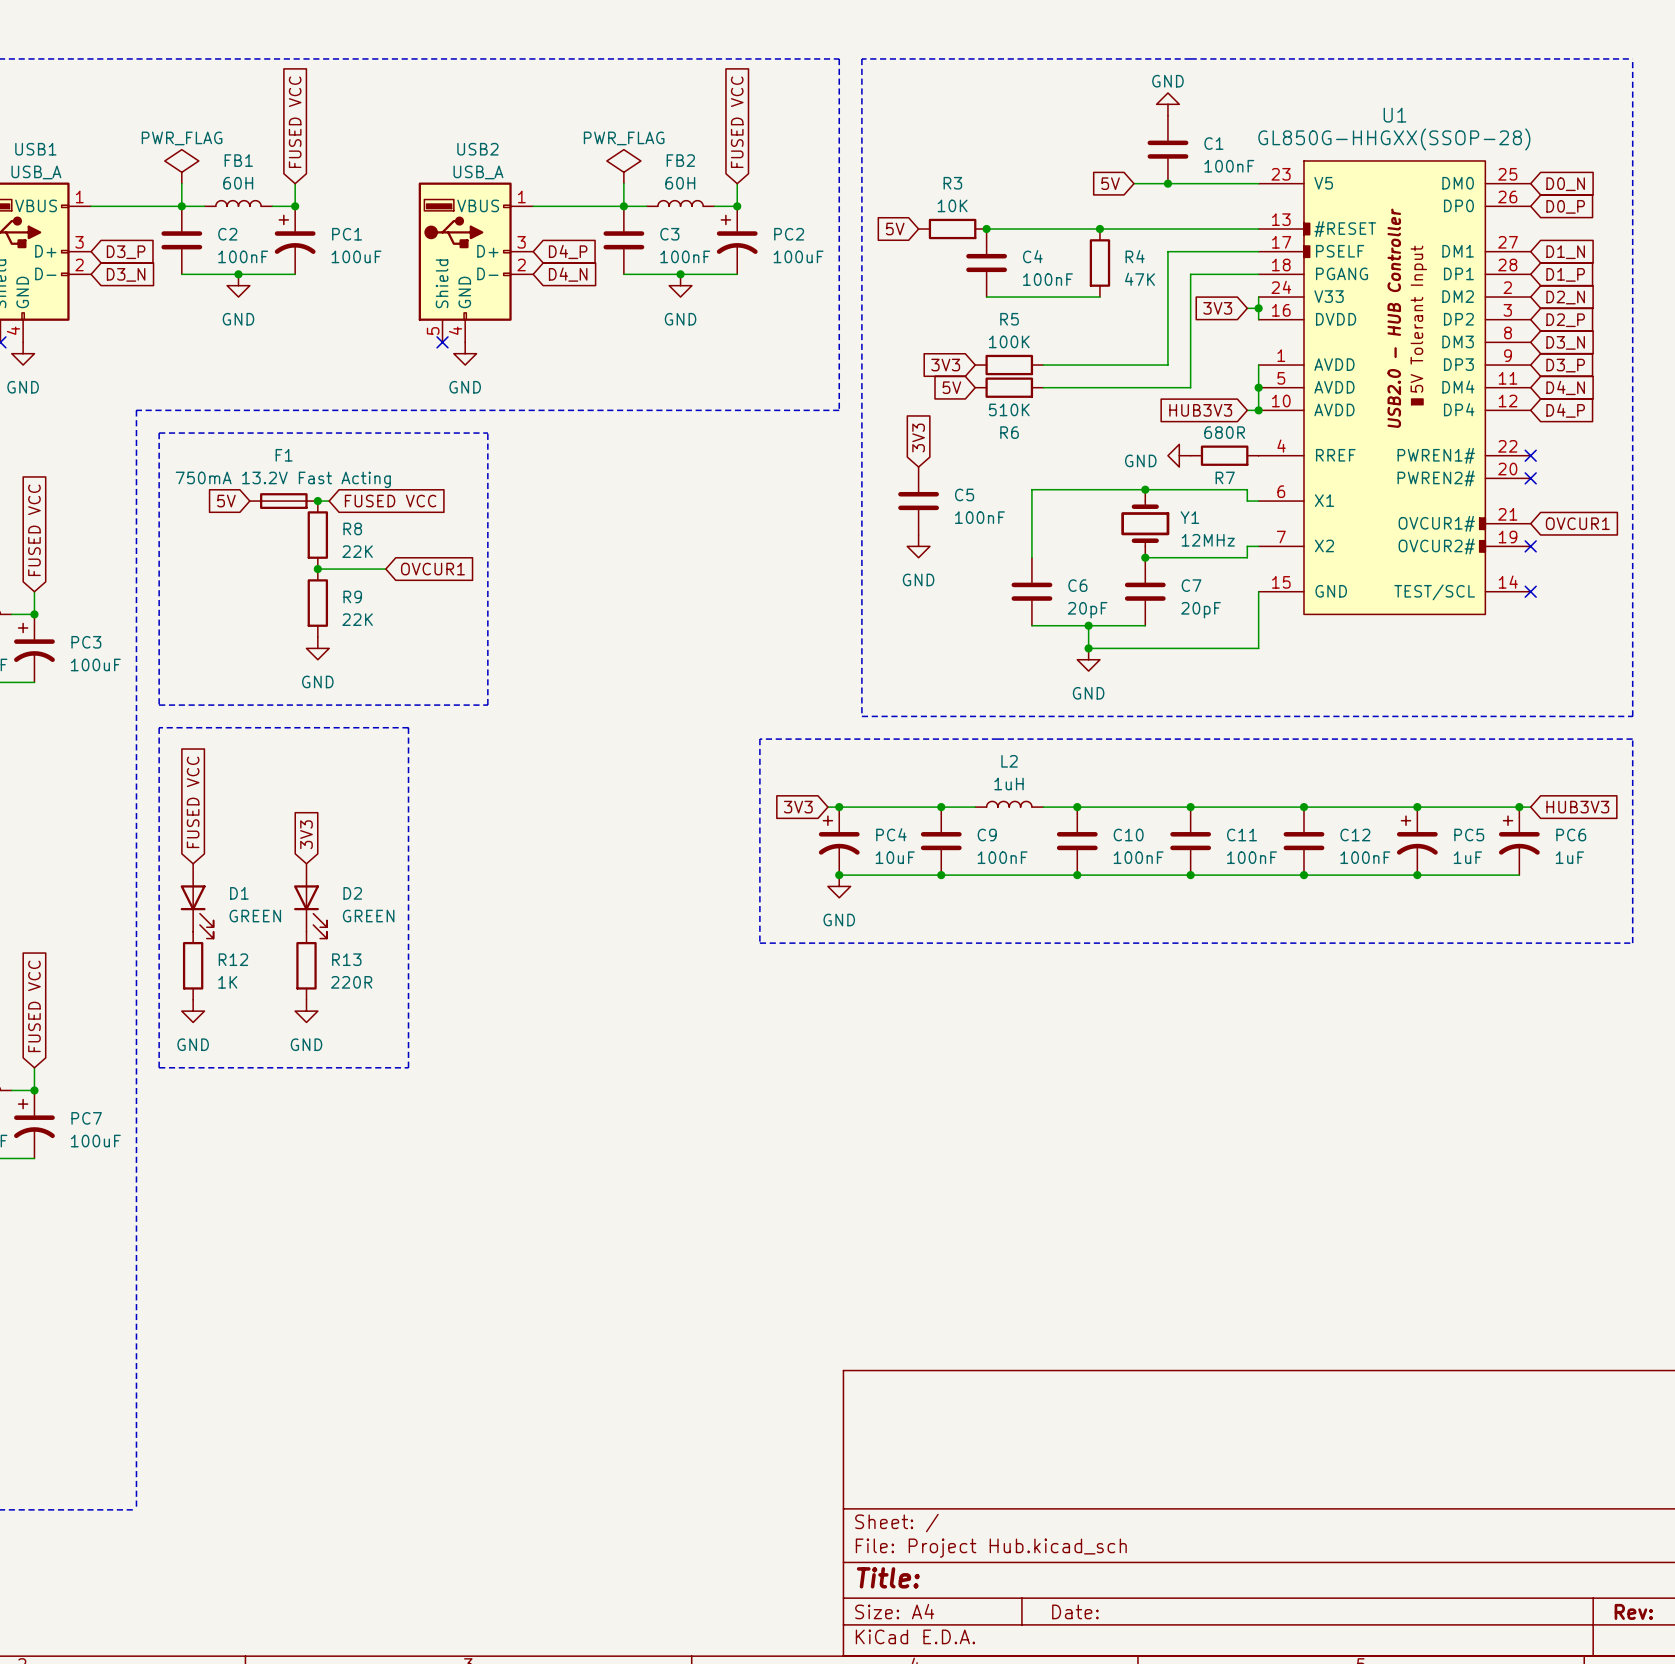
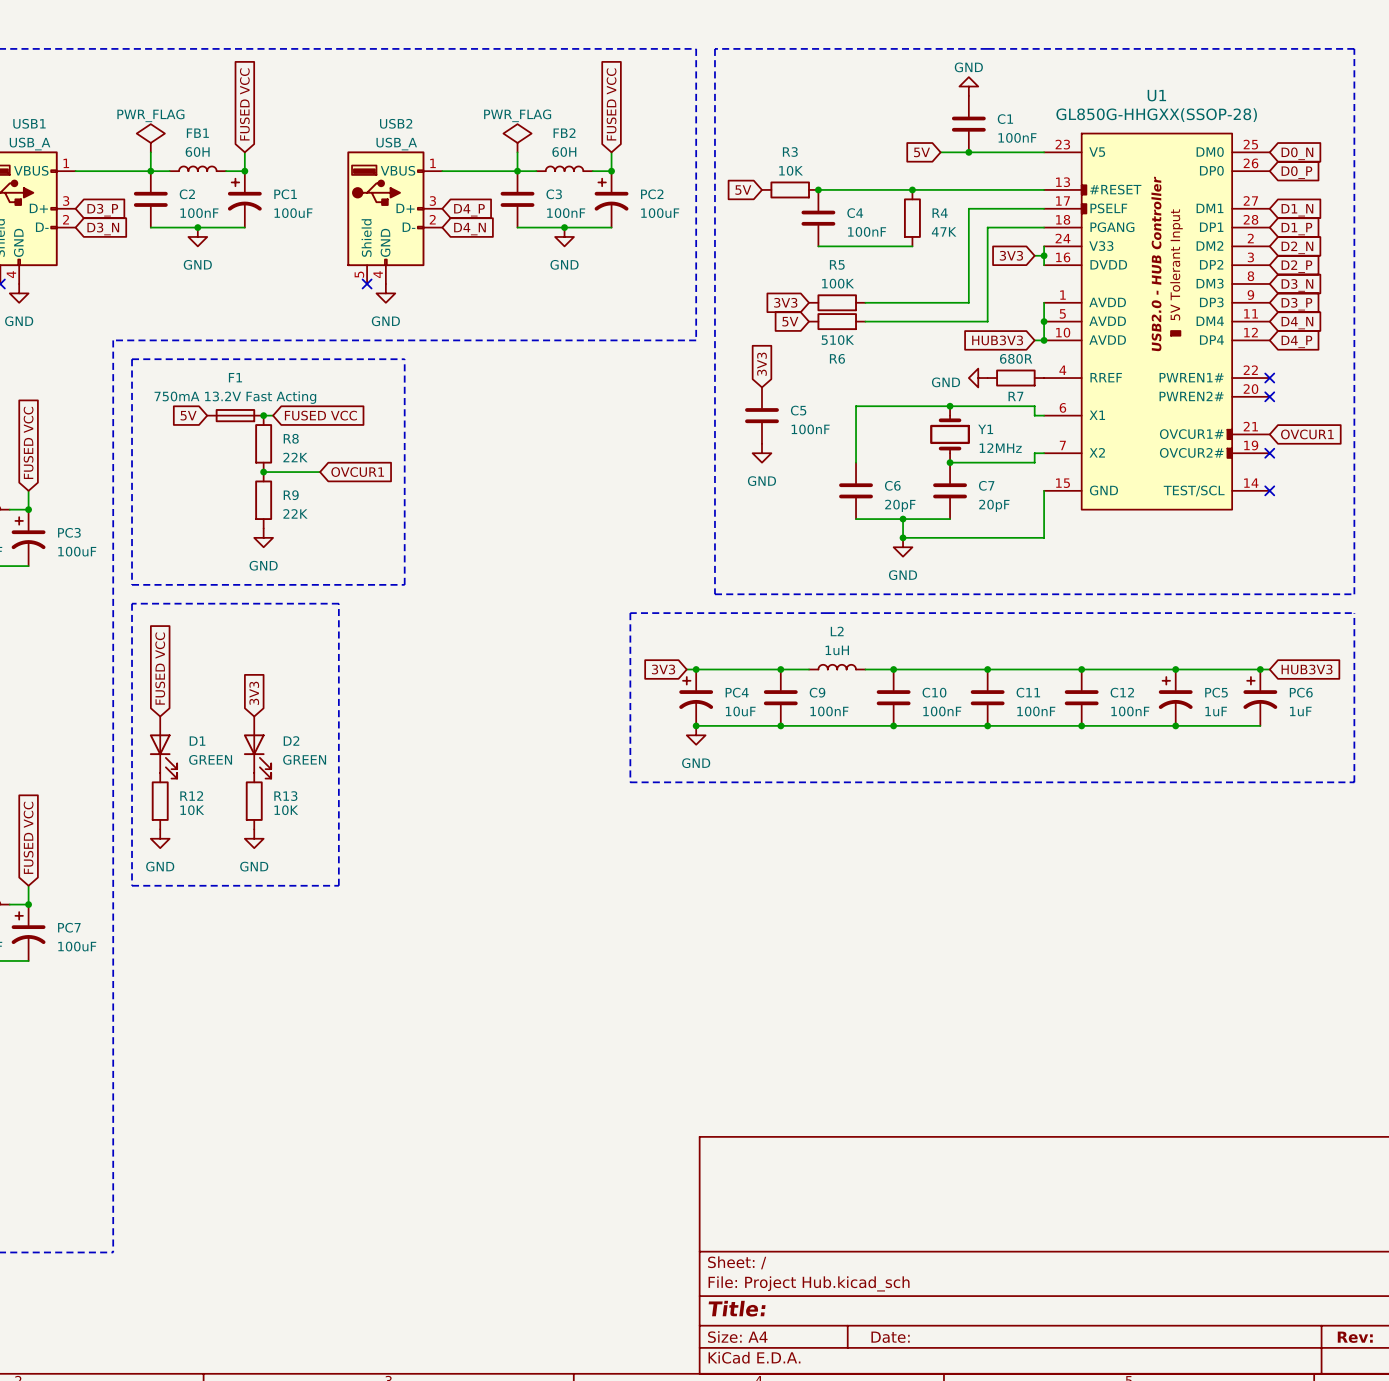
R12 value: 1K (227, 982) -> 10K (192, 810)
R13 value: 220R (351, 982) -> 10K (286, 810)

